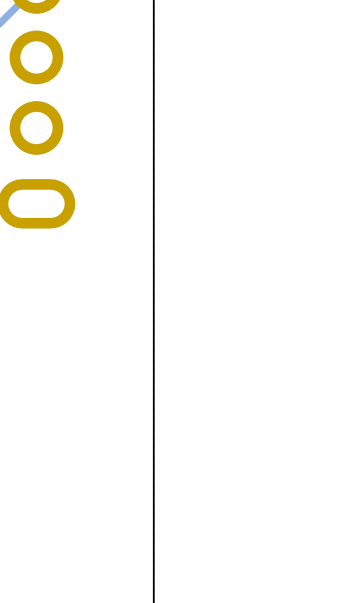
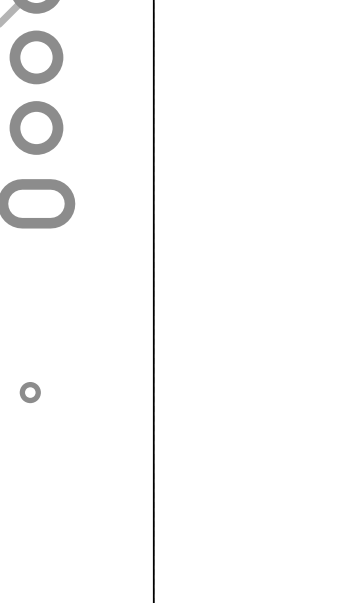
via: none -> (30, 392)

